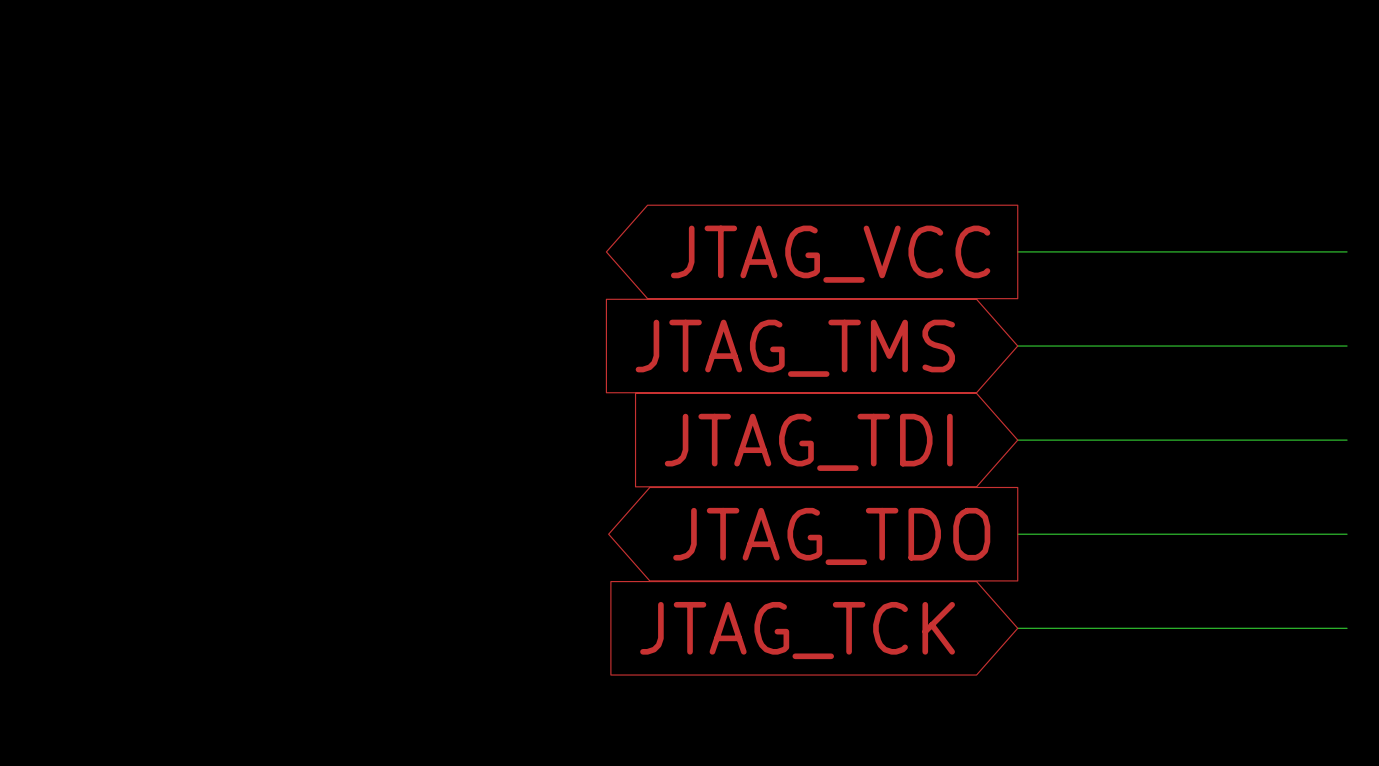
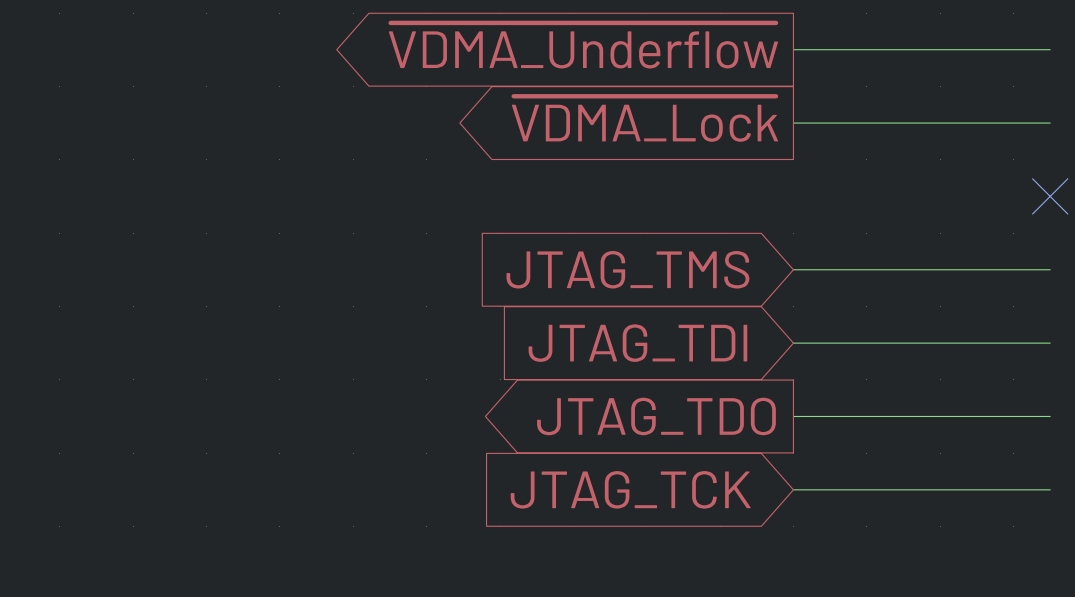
global label: none -> ~{VDMA_Underflow} (583, 45)
wire: none -> (793, 49) (1050, 49)
global label: none -> ~{VDMA_Lock} (644, 119)
wire: (1017, 251) (1347, 251) -> (793, 123) (1050, 123)
no-connect mark: none -> (1050, 196)
global label: JTAG_VCC (830, 254) -> none

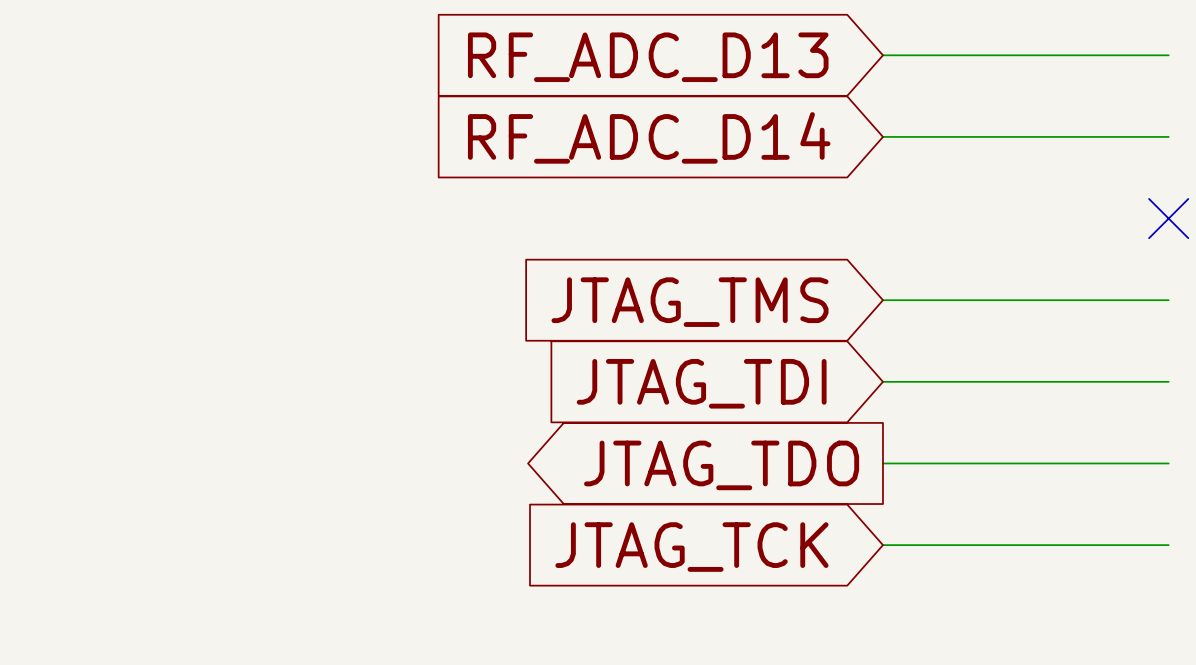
global label shape: output (583, 45) -> input (648, 57)
global label: ~{VDMA_Underflow} (583, 45) -> RF_ADC_D13 (648, 57)
global label shape: output (644, 119) -> input (649, 137)
global label: ~{VDMA_Lock} (644, 119) -> RF_ADC_D14 (649, 137)

